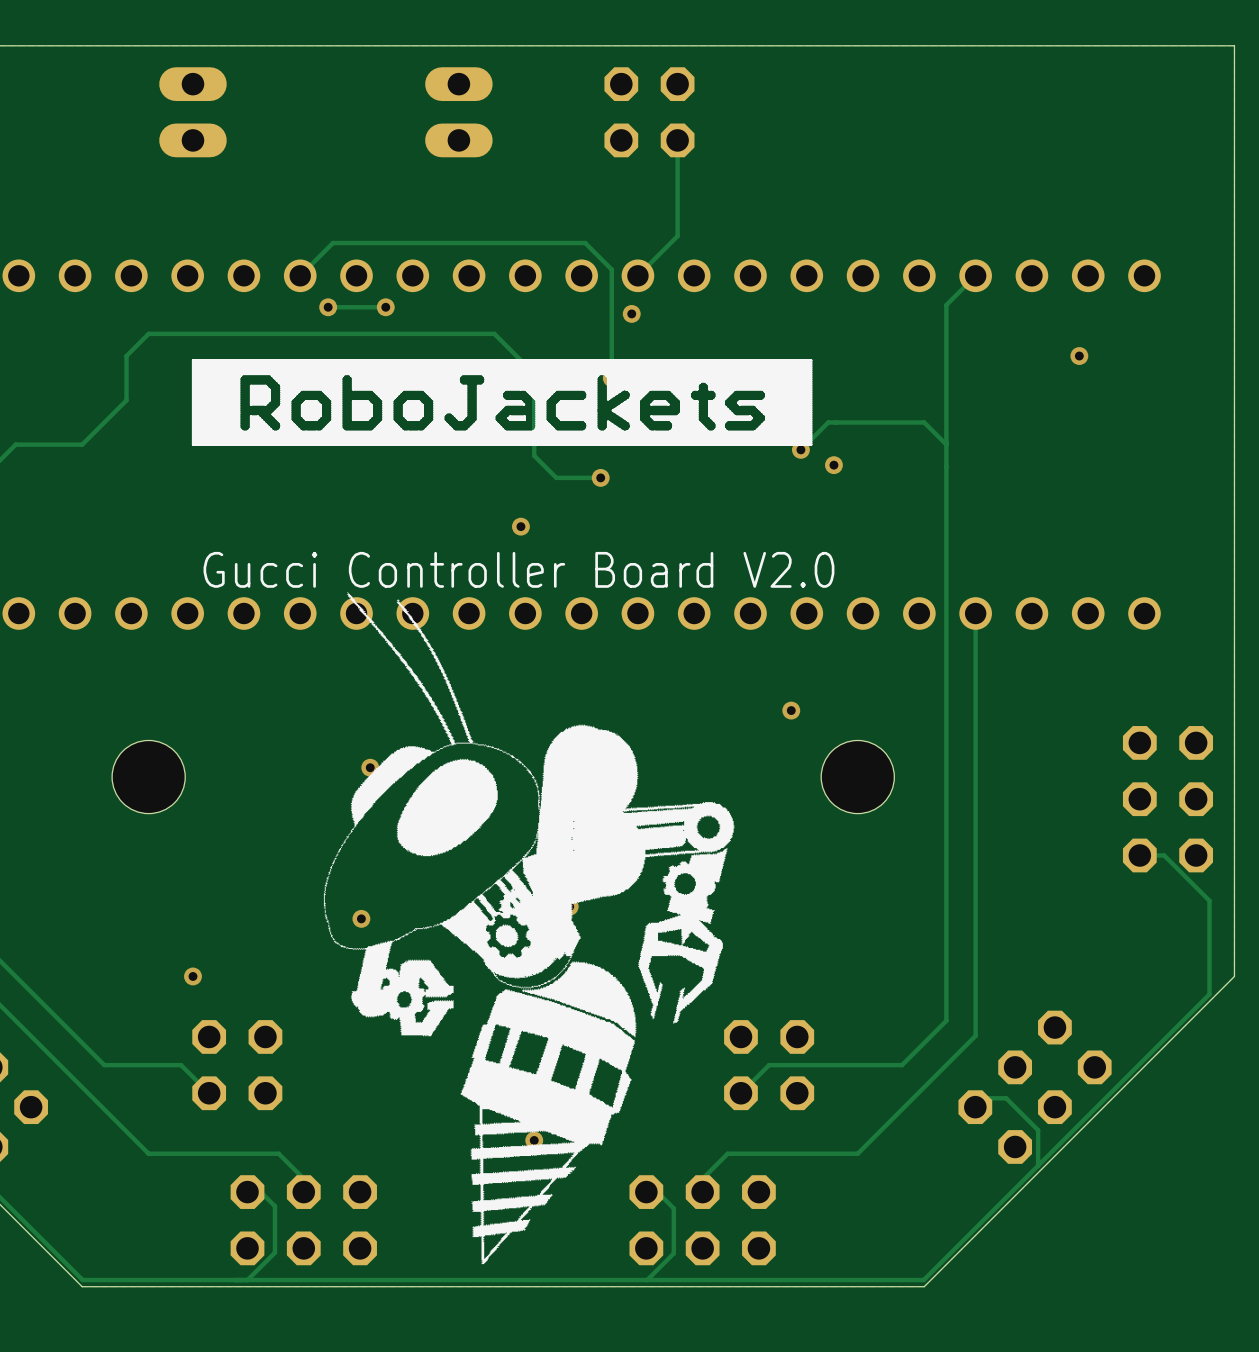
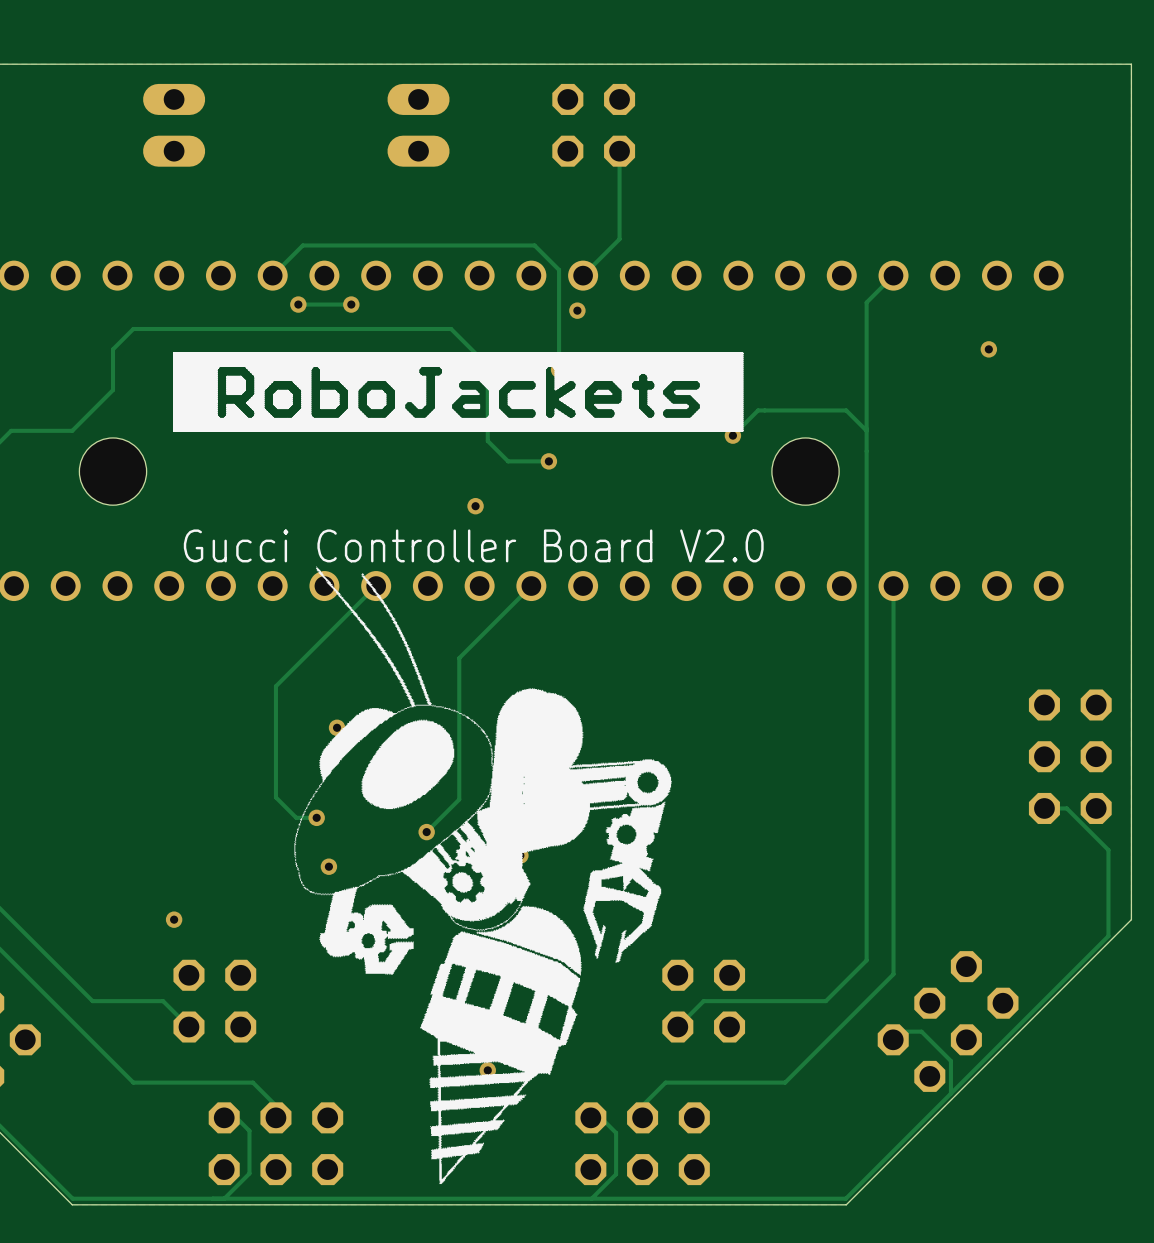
via: (833, 465) -> none
track: none -> (376, 586) (275, 686) (275, 797) (296, 817) (316, 817)
track: none -> (531, 586) (459, 658) (459, 799) (426, 832)
via: (791, 710) -> none
hole position: (148, 777) -> (113, 471)
hole position: (857, 777) -> (805, 471)
via: none -> (316, 817)
via: none -> (426, 832)

